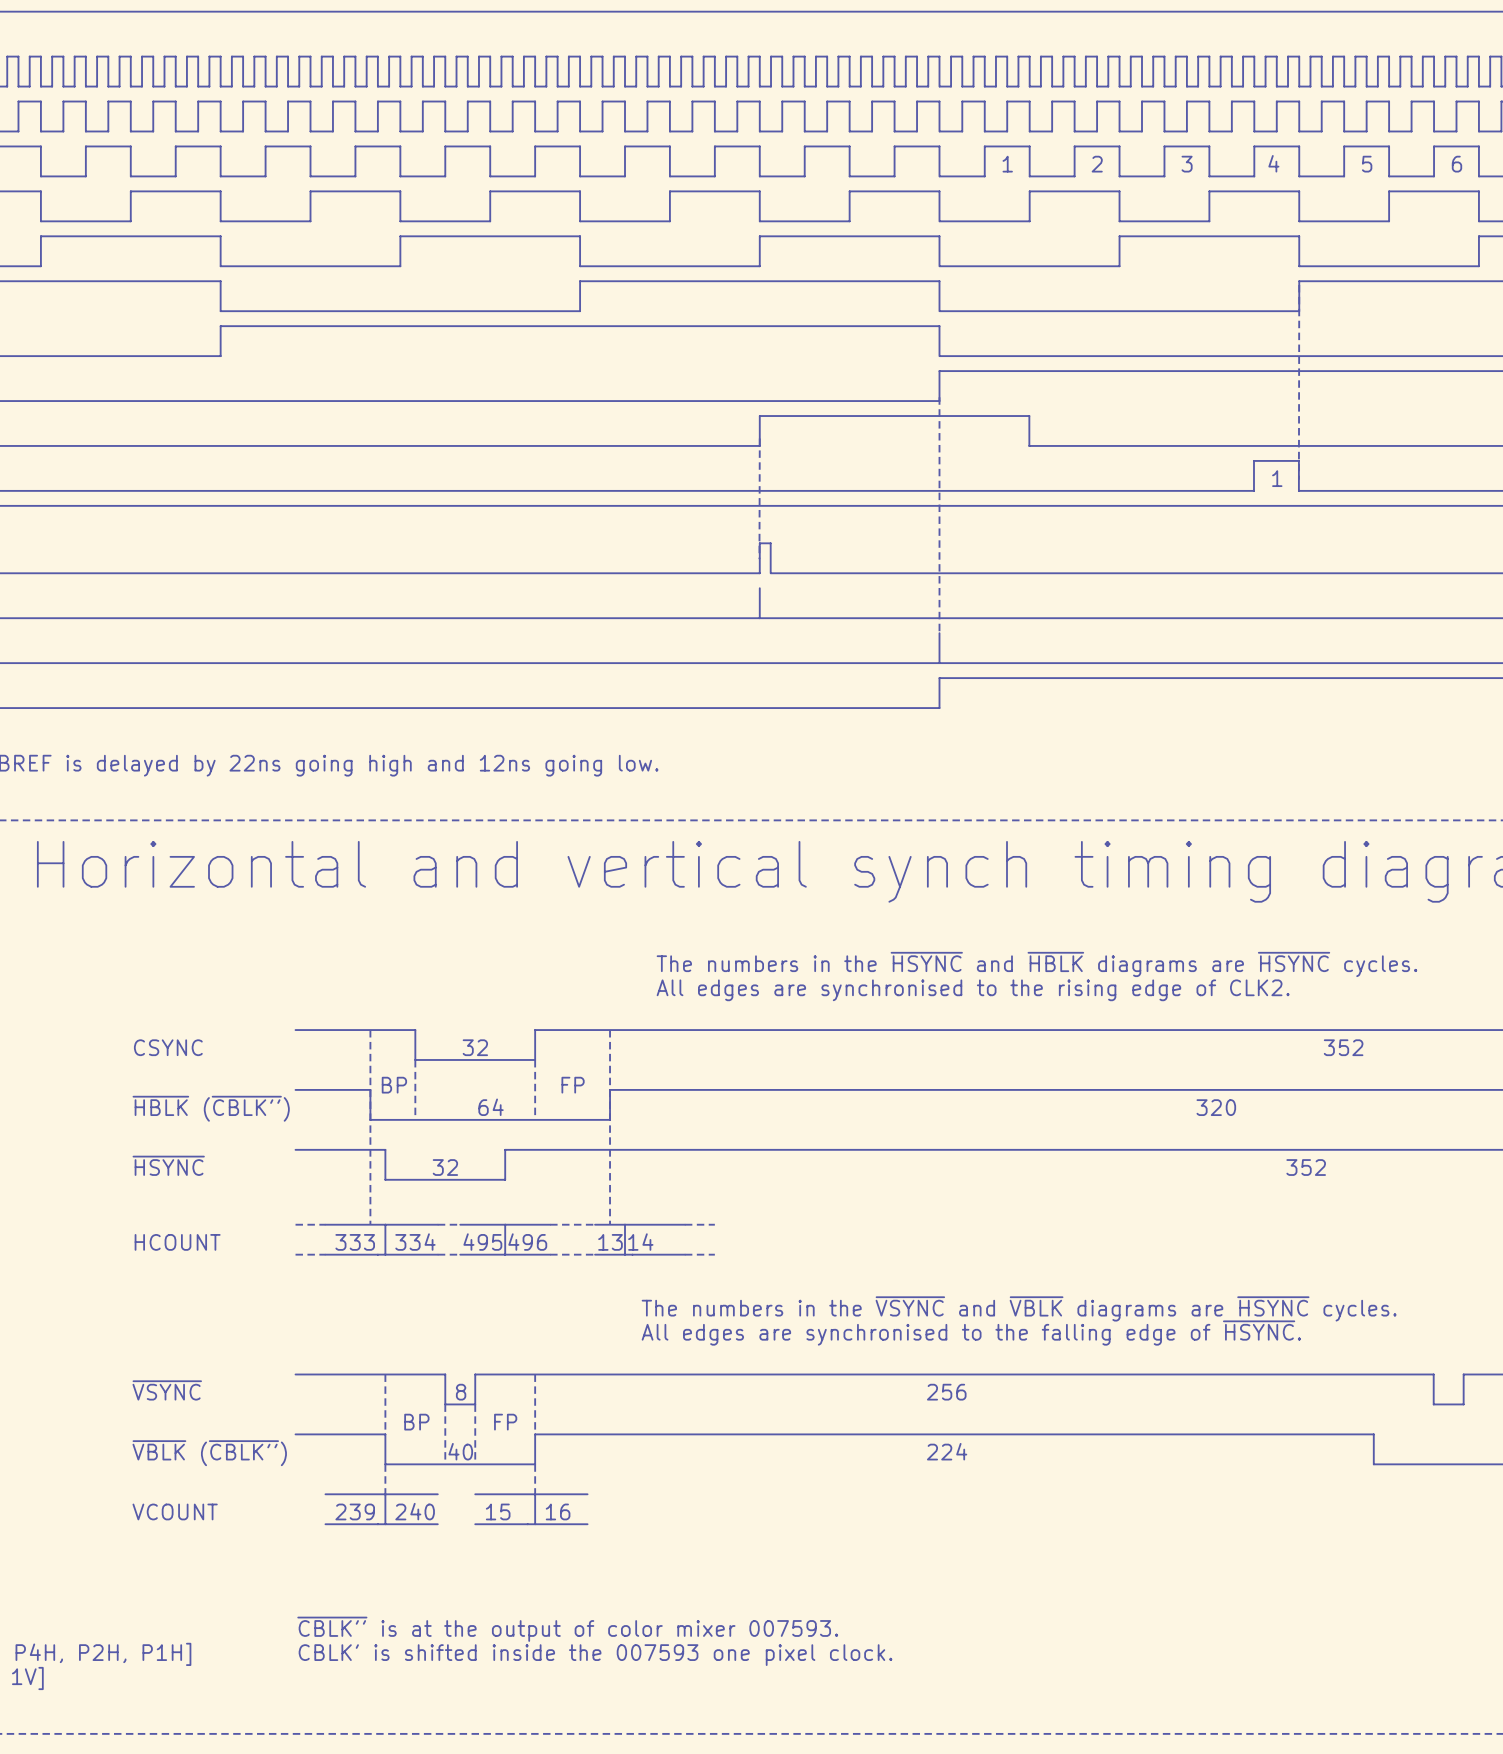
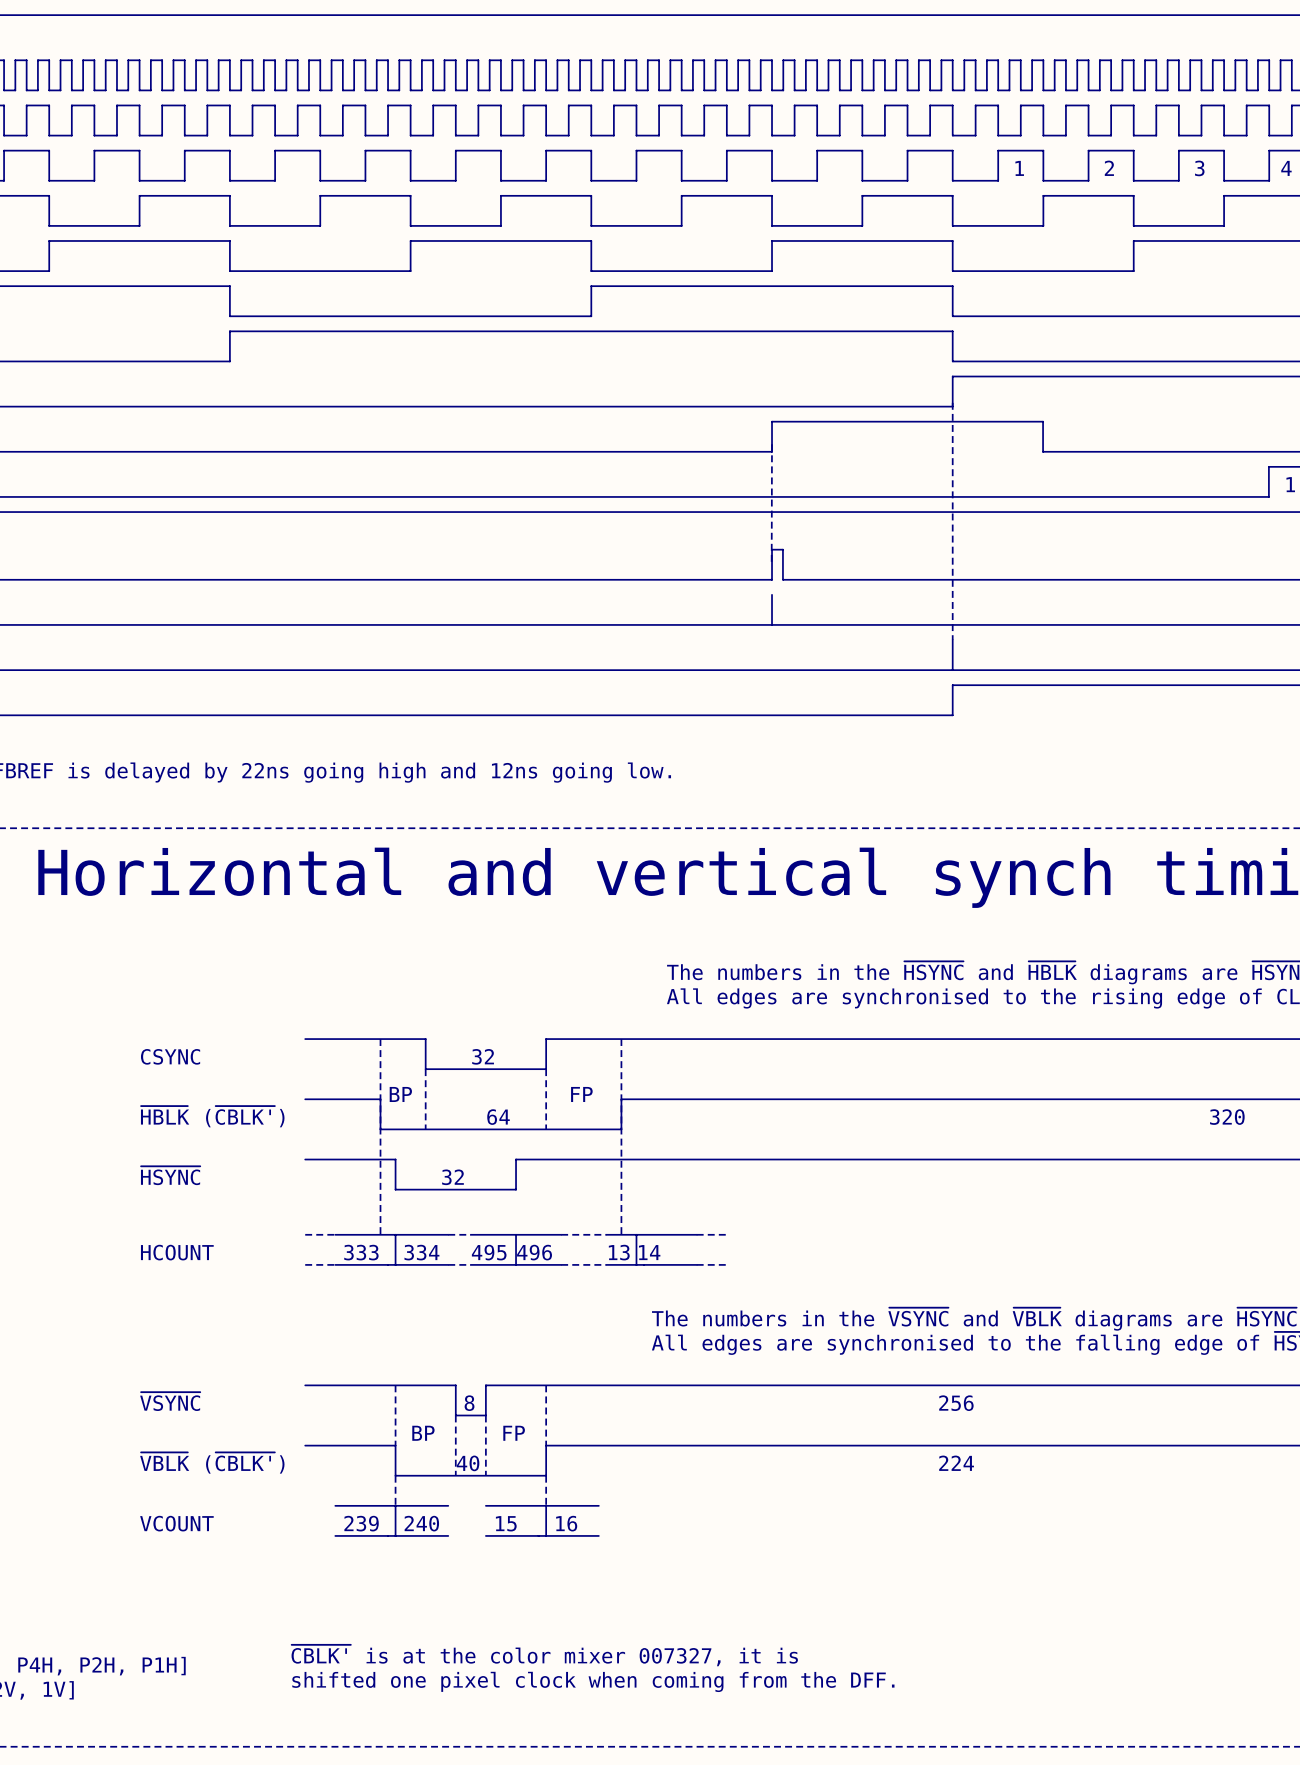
text: ~{HBLK} (~{CBLK''}) (211, 1108) -> ~{HBLK} (~{CBLK'}) (212, 1116)
text: ~{VBLK} (~{CBLK''}) (209, 1453) -> ~{VBLK} (~{CBLK'}) (212, 1463)
text: ~{CBLK''} is at the output of color mixer 007593. (567, 1629) -> ~{CBLK'} is at the color mixer 007327, it is (544, 1655)
text: CBLK' is shifted inside the 007593 one pixel clock. (595, 1655) -> none
text: none -> shifted one pixel clock when coming from the DFF. (593, 1681)

